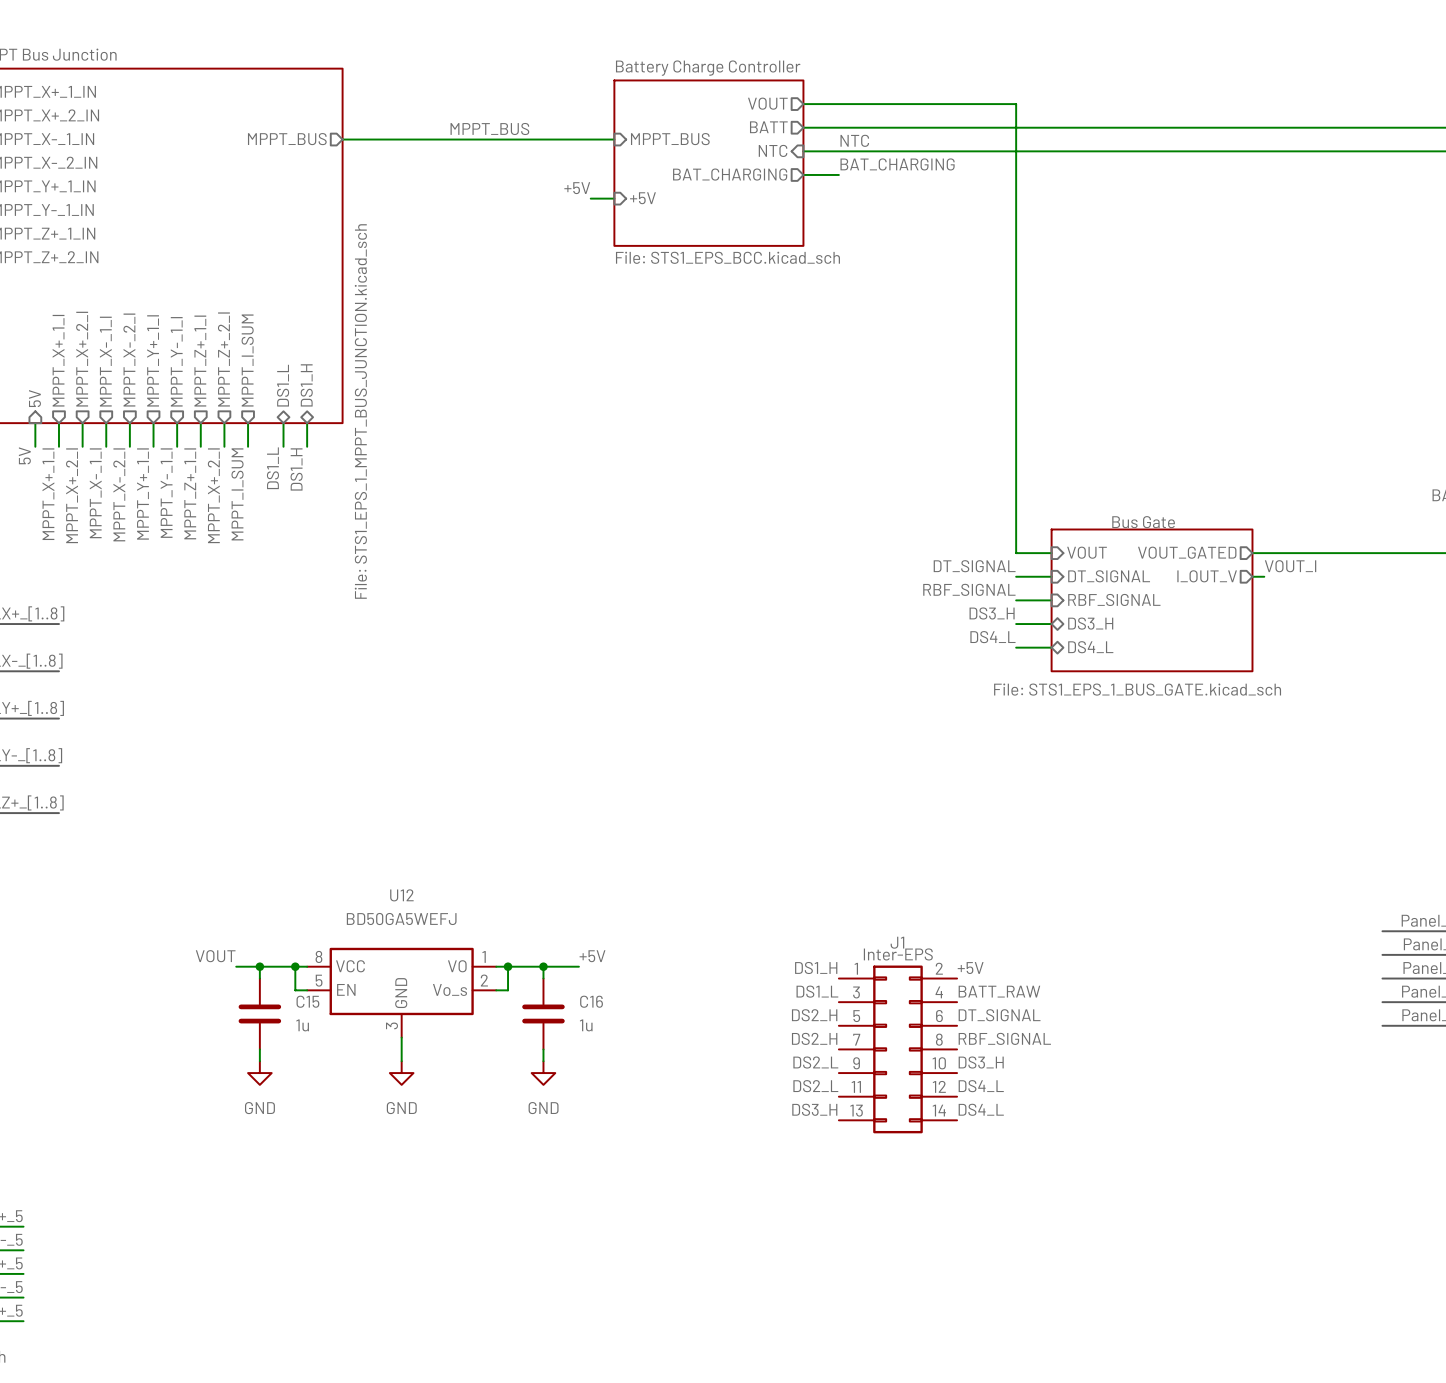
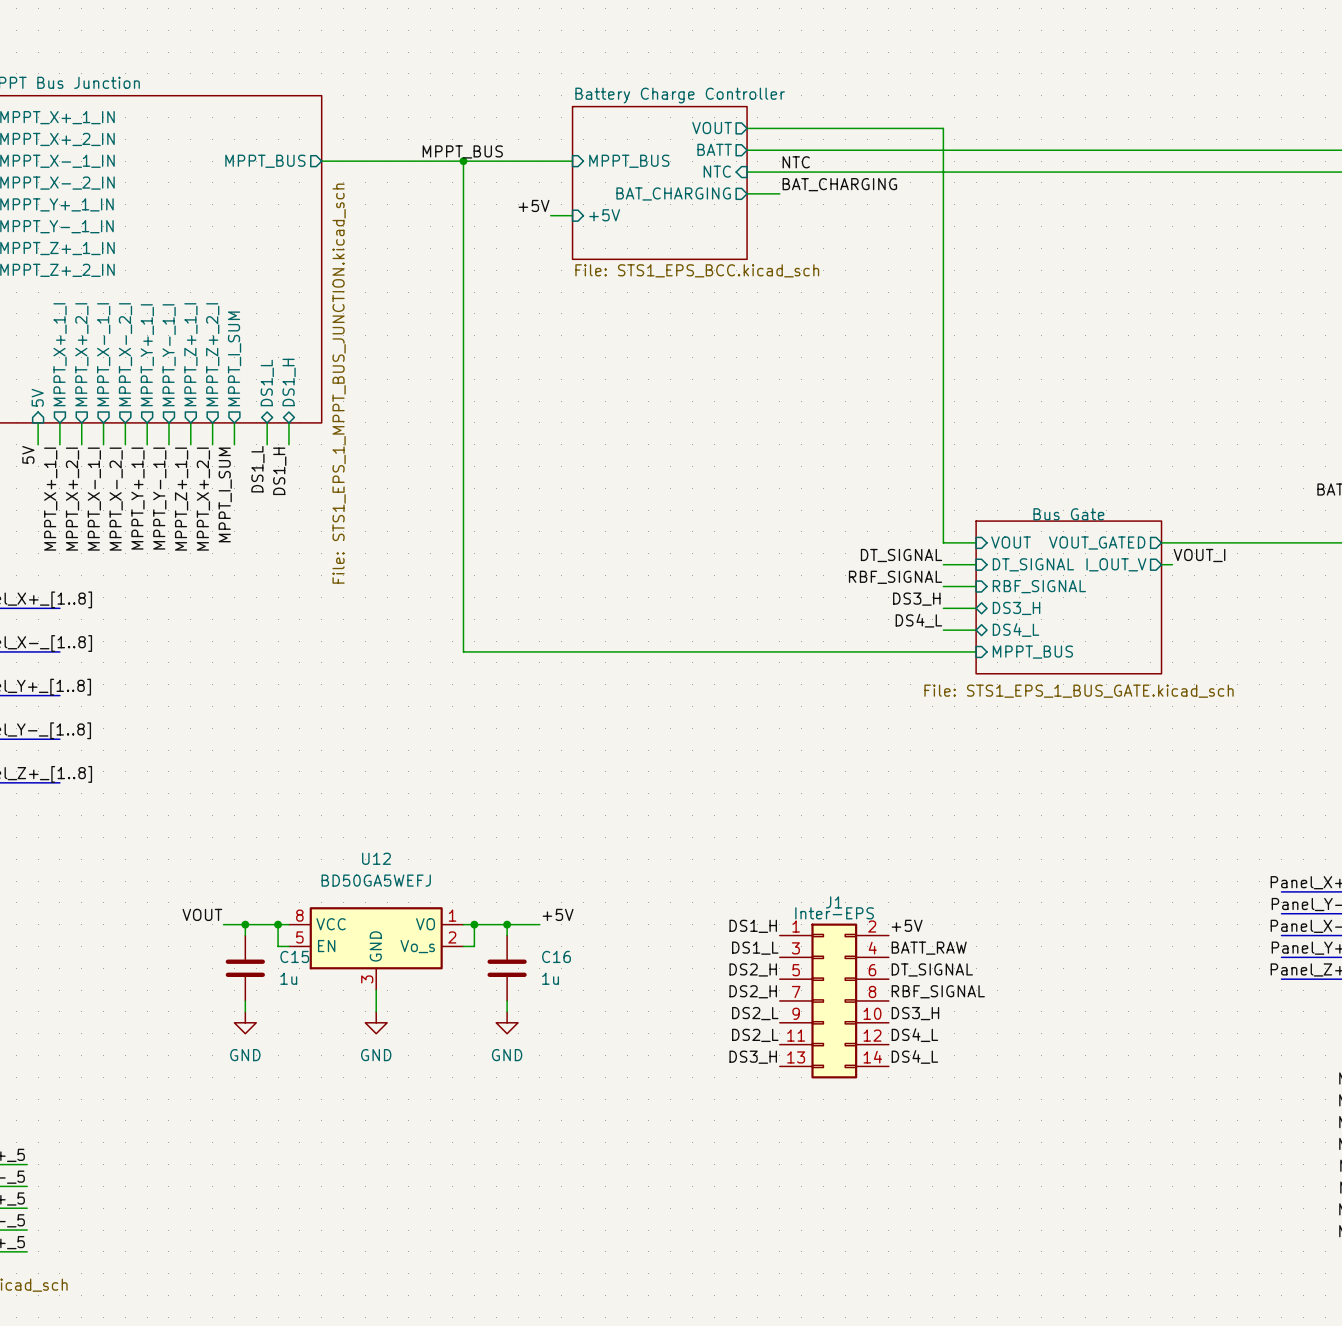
wire: none -> (463, 161) (463, 651) (976, 651)
junction: none -> (463, 161)
sheet Bus Gate: File: STS1_EPS_1_BUS_GATE.kicad_sch (1152, 600) -> none
sheet Bus Gate: none -> File: STS1_EPS_1_BUS_GATE.kicad_sch (1068, 597)
sheet pin: none -> MPPT_BUS (1032, 652)

